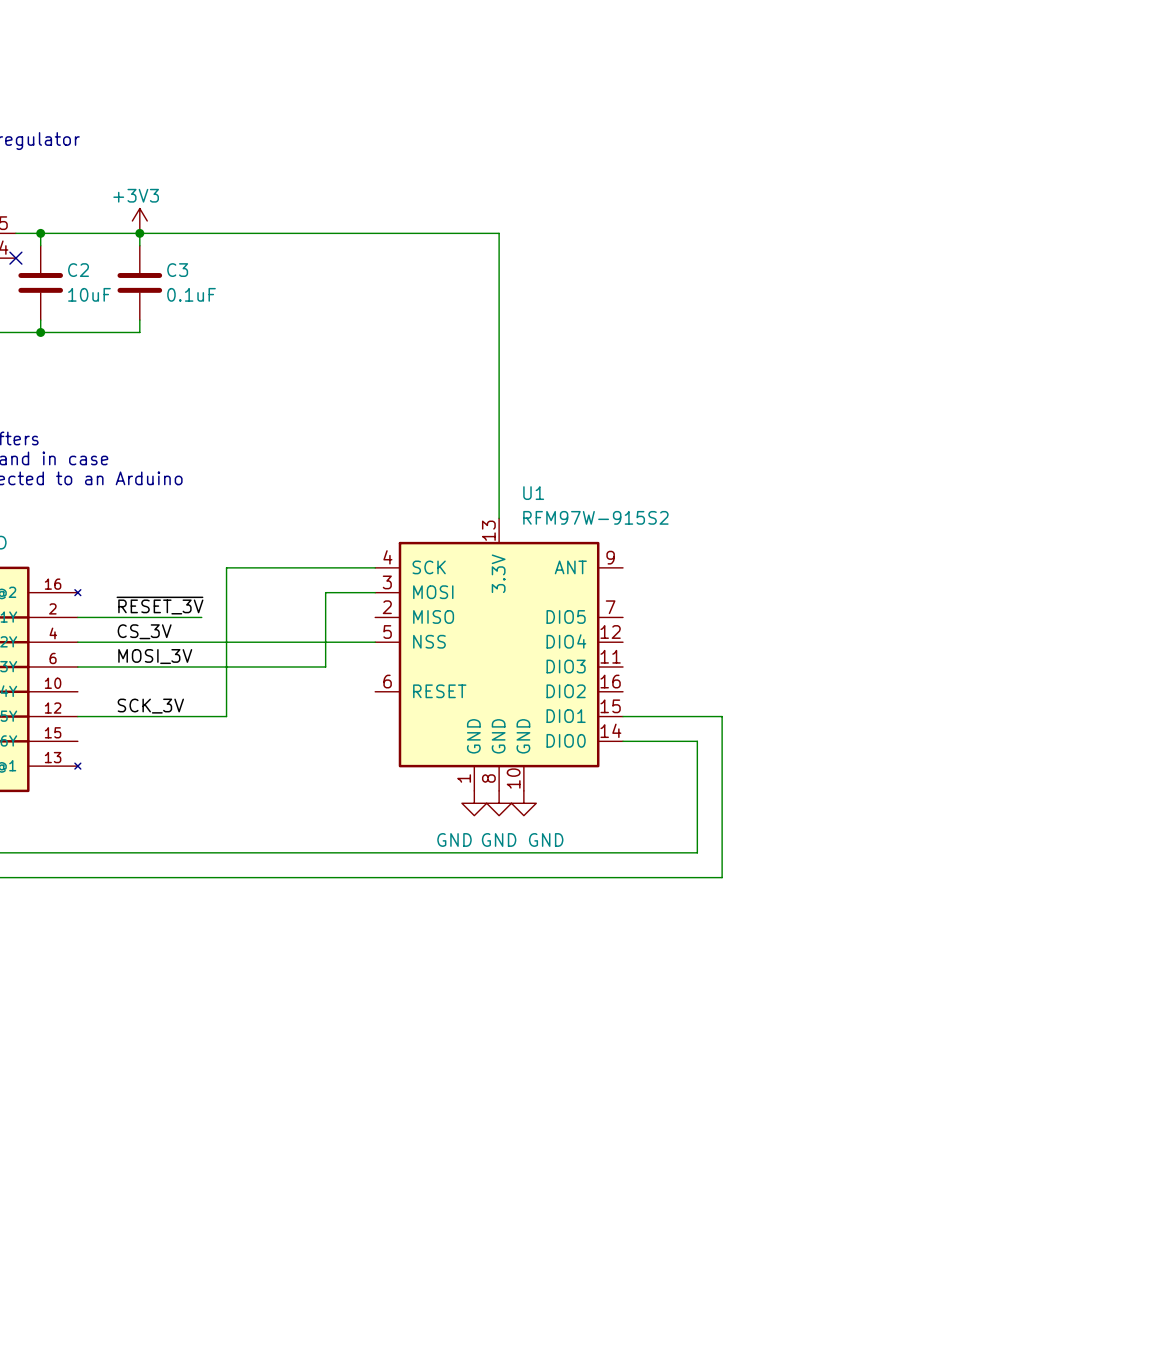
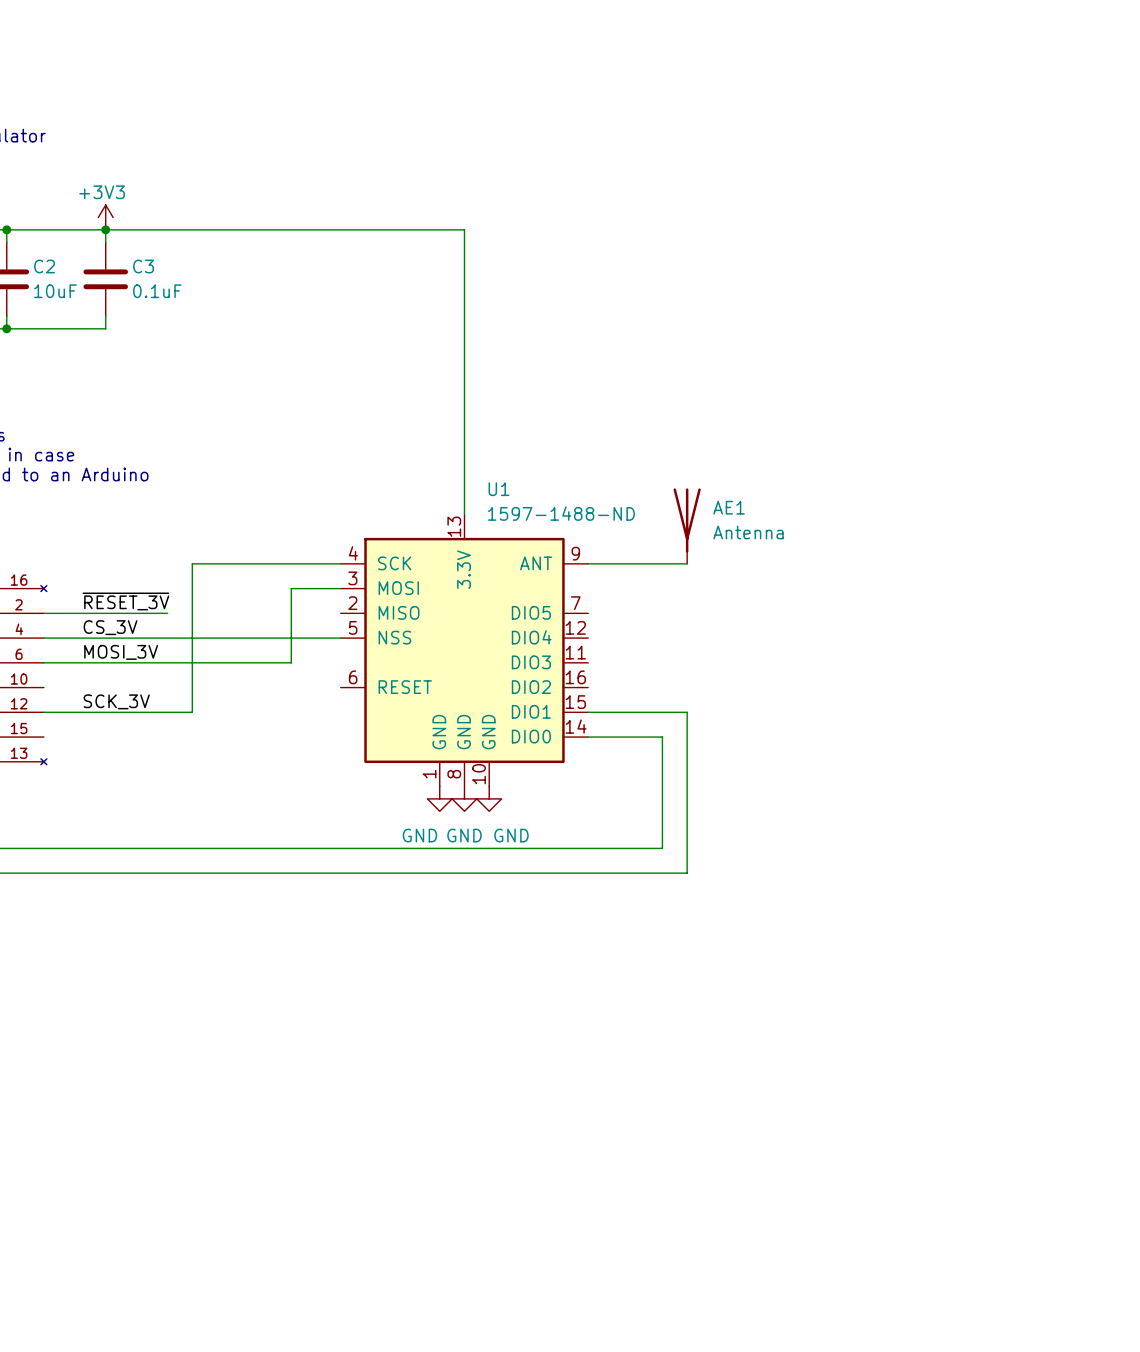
U1 value: RFM97W-915S2 (595, 517) -> 1597-1488-ND (561, 513)
AE1: none -> Antenna (687, 526)
wire: none -> (588, 563) (687, 563)

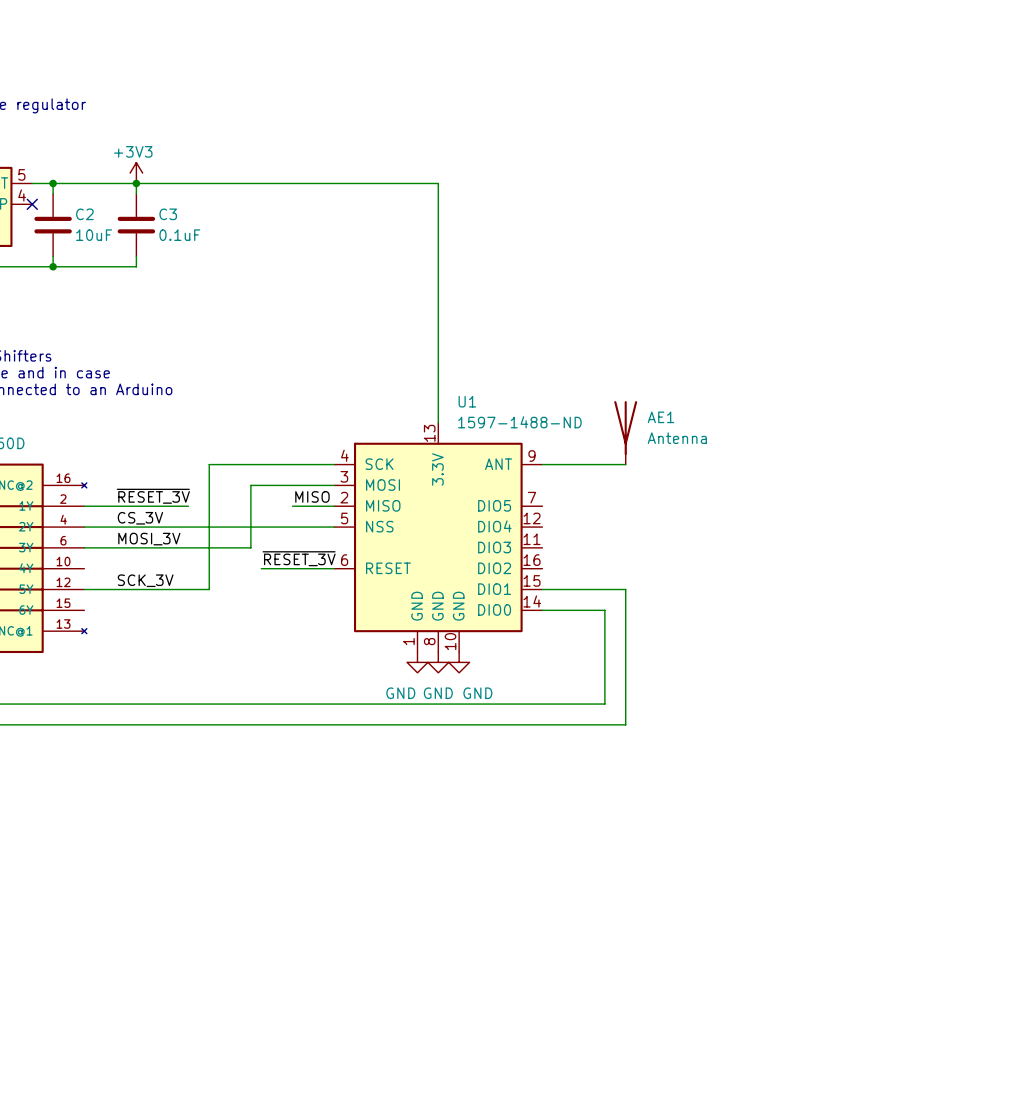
wire: (291, 588) (291, 662) (241, 662) -> (292, 485) (250, 485) (250, 547)
label: none -> MISO (312, 496)
wire: none -> (292, 506) (334, 506)
label: none -> ~{RESET_3V} (299, 558)
wire: none -> (261, 568) (334, 568)

